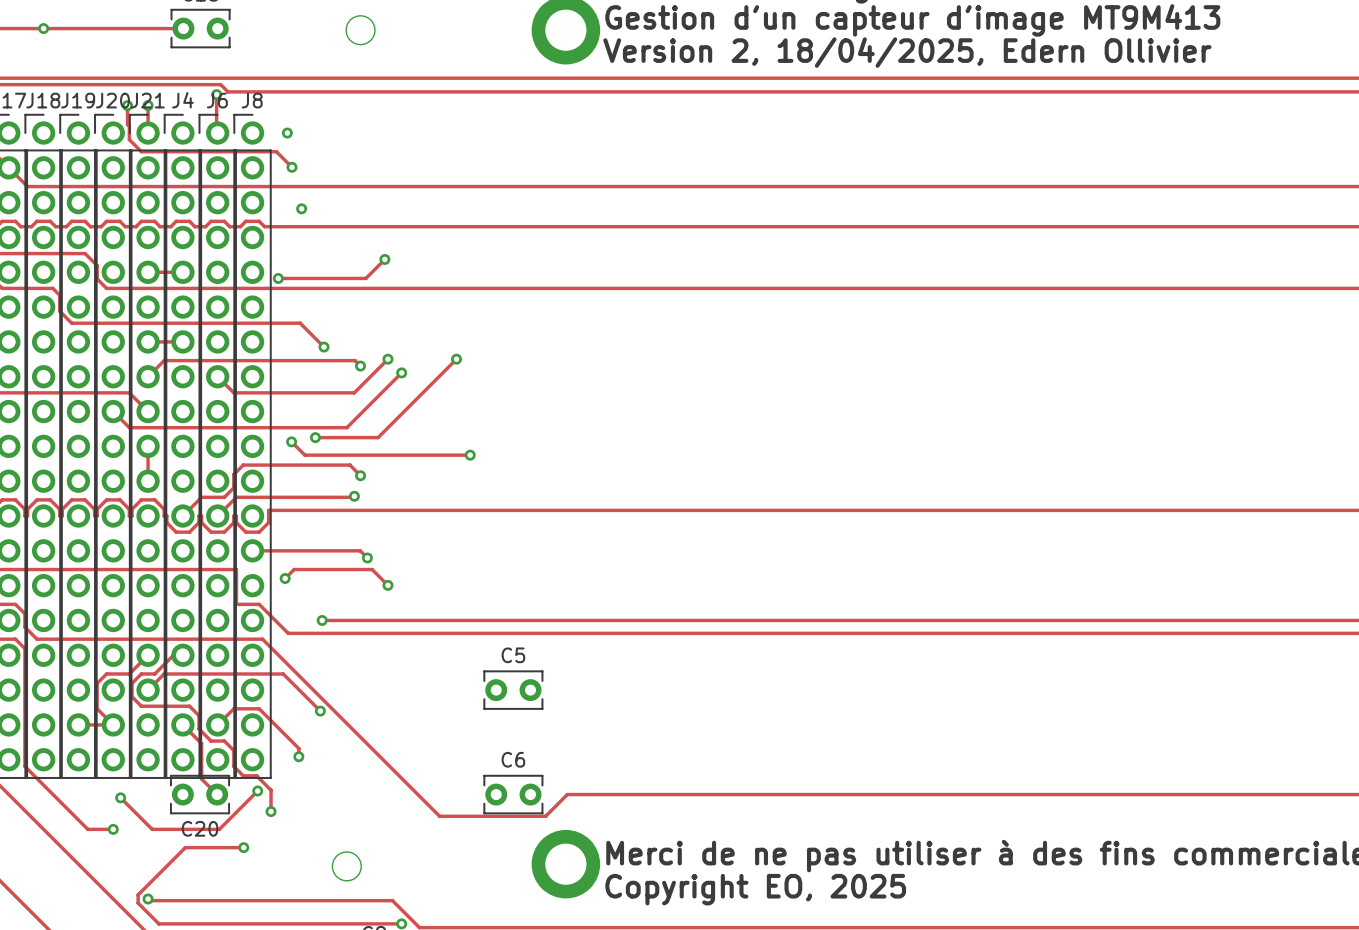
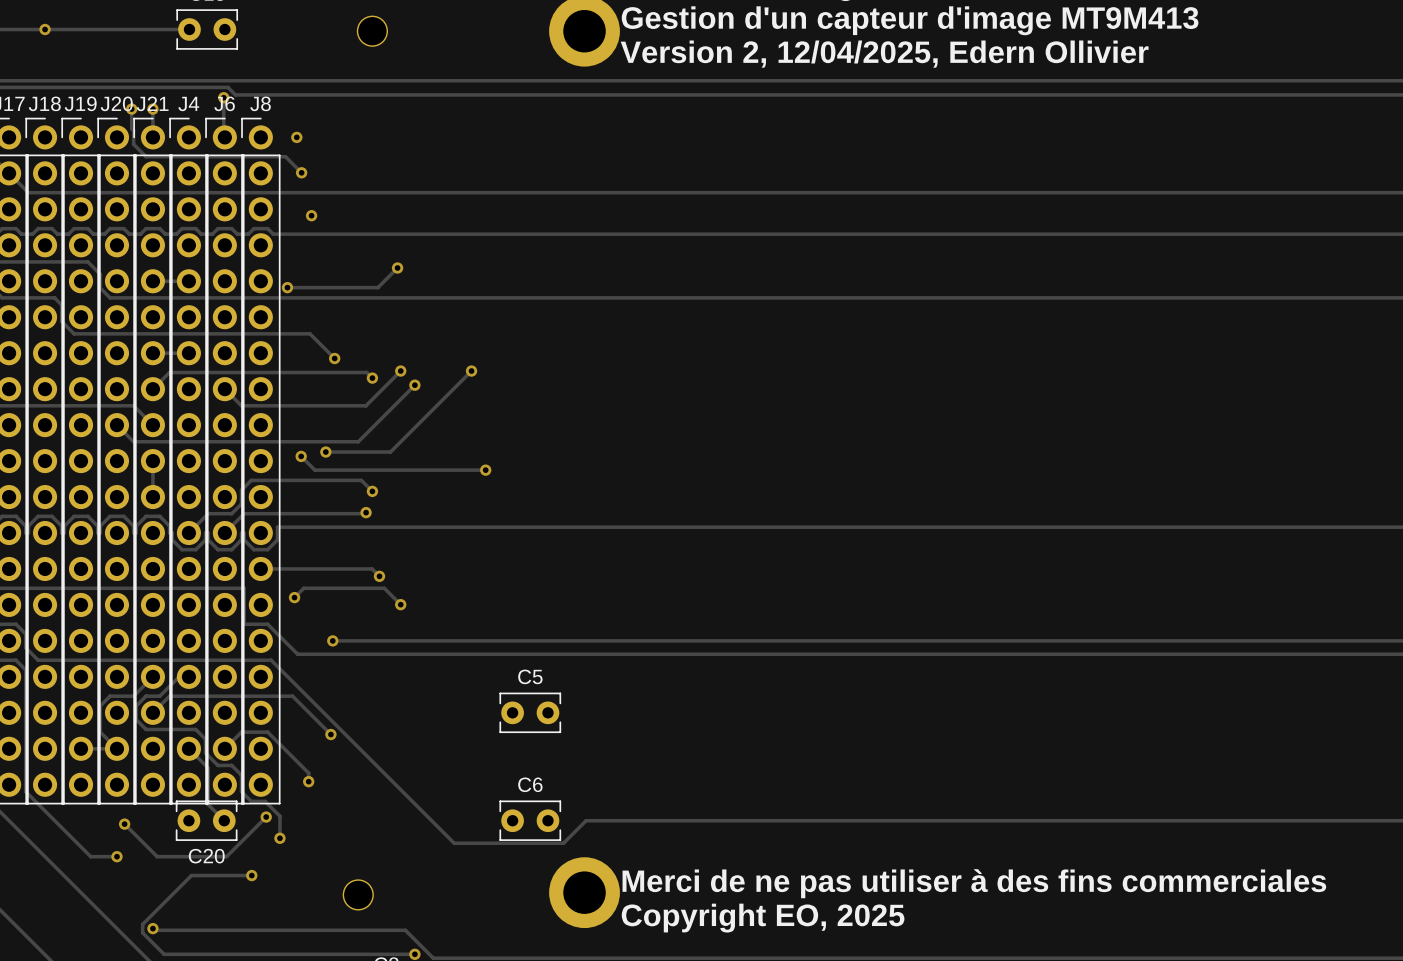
text: Version 2, 18/04/2025, Edern Ollivier (907, 52) -> Version 2, 12/04/2025, Edern Ollivier (884, 54)

